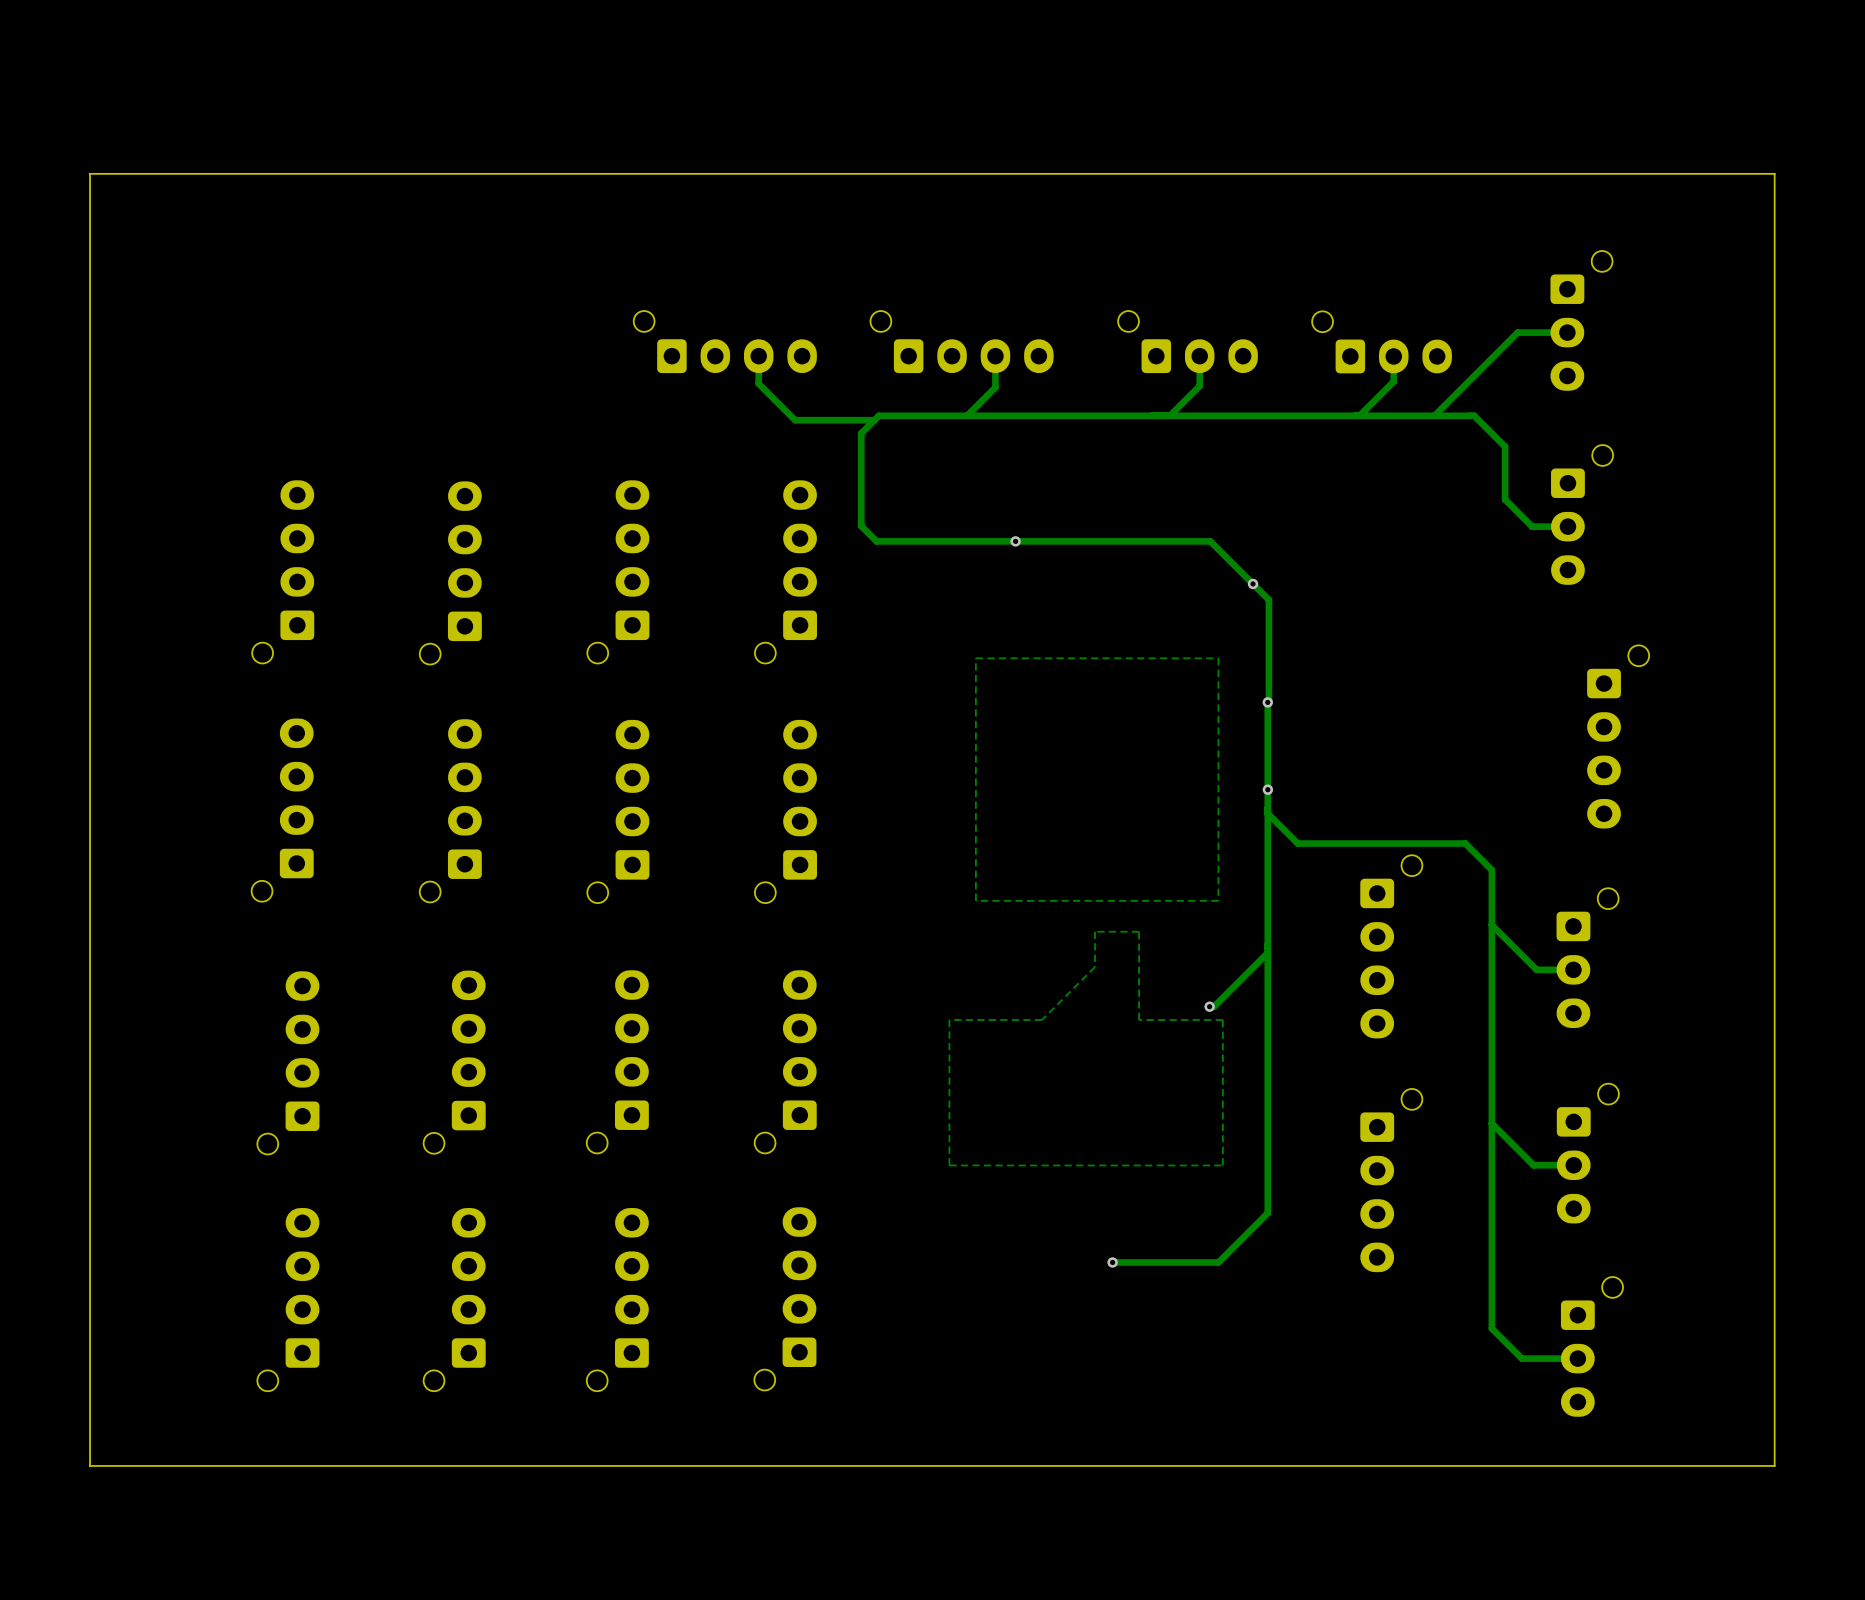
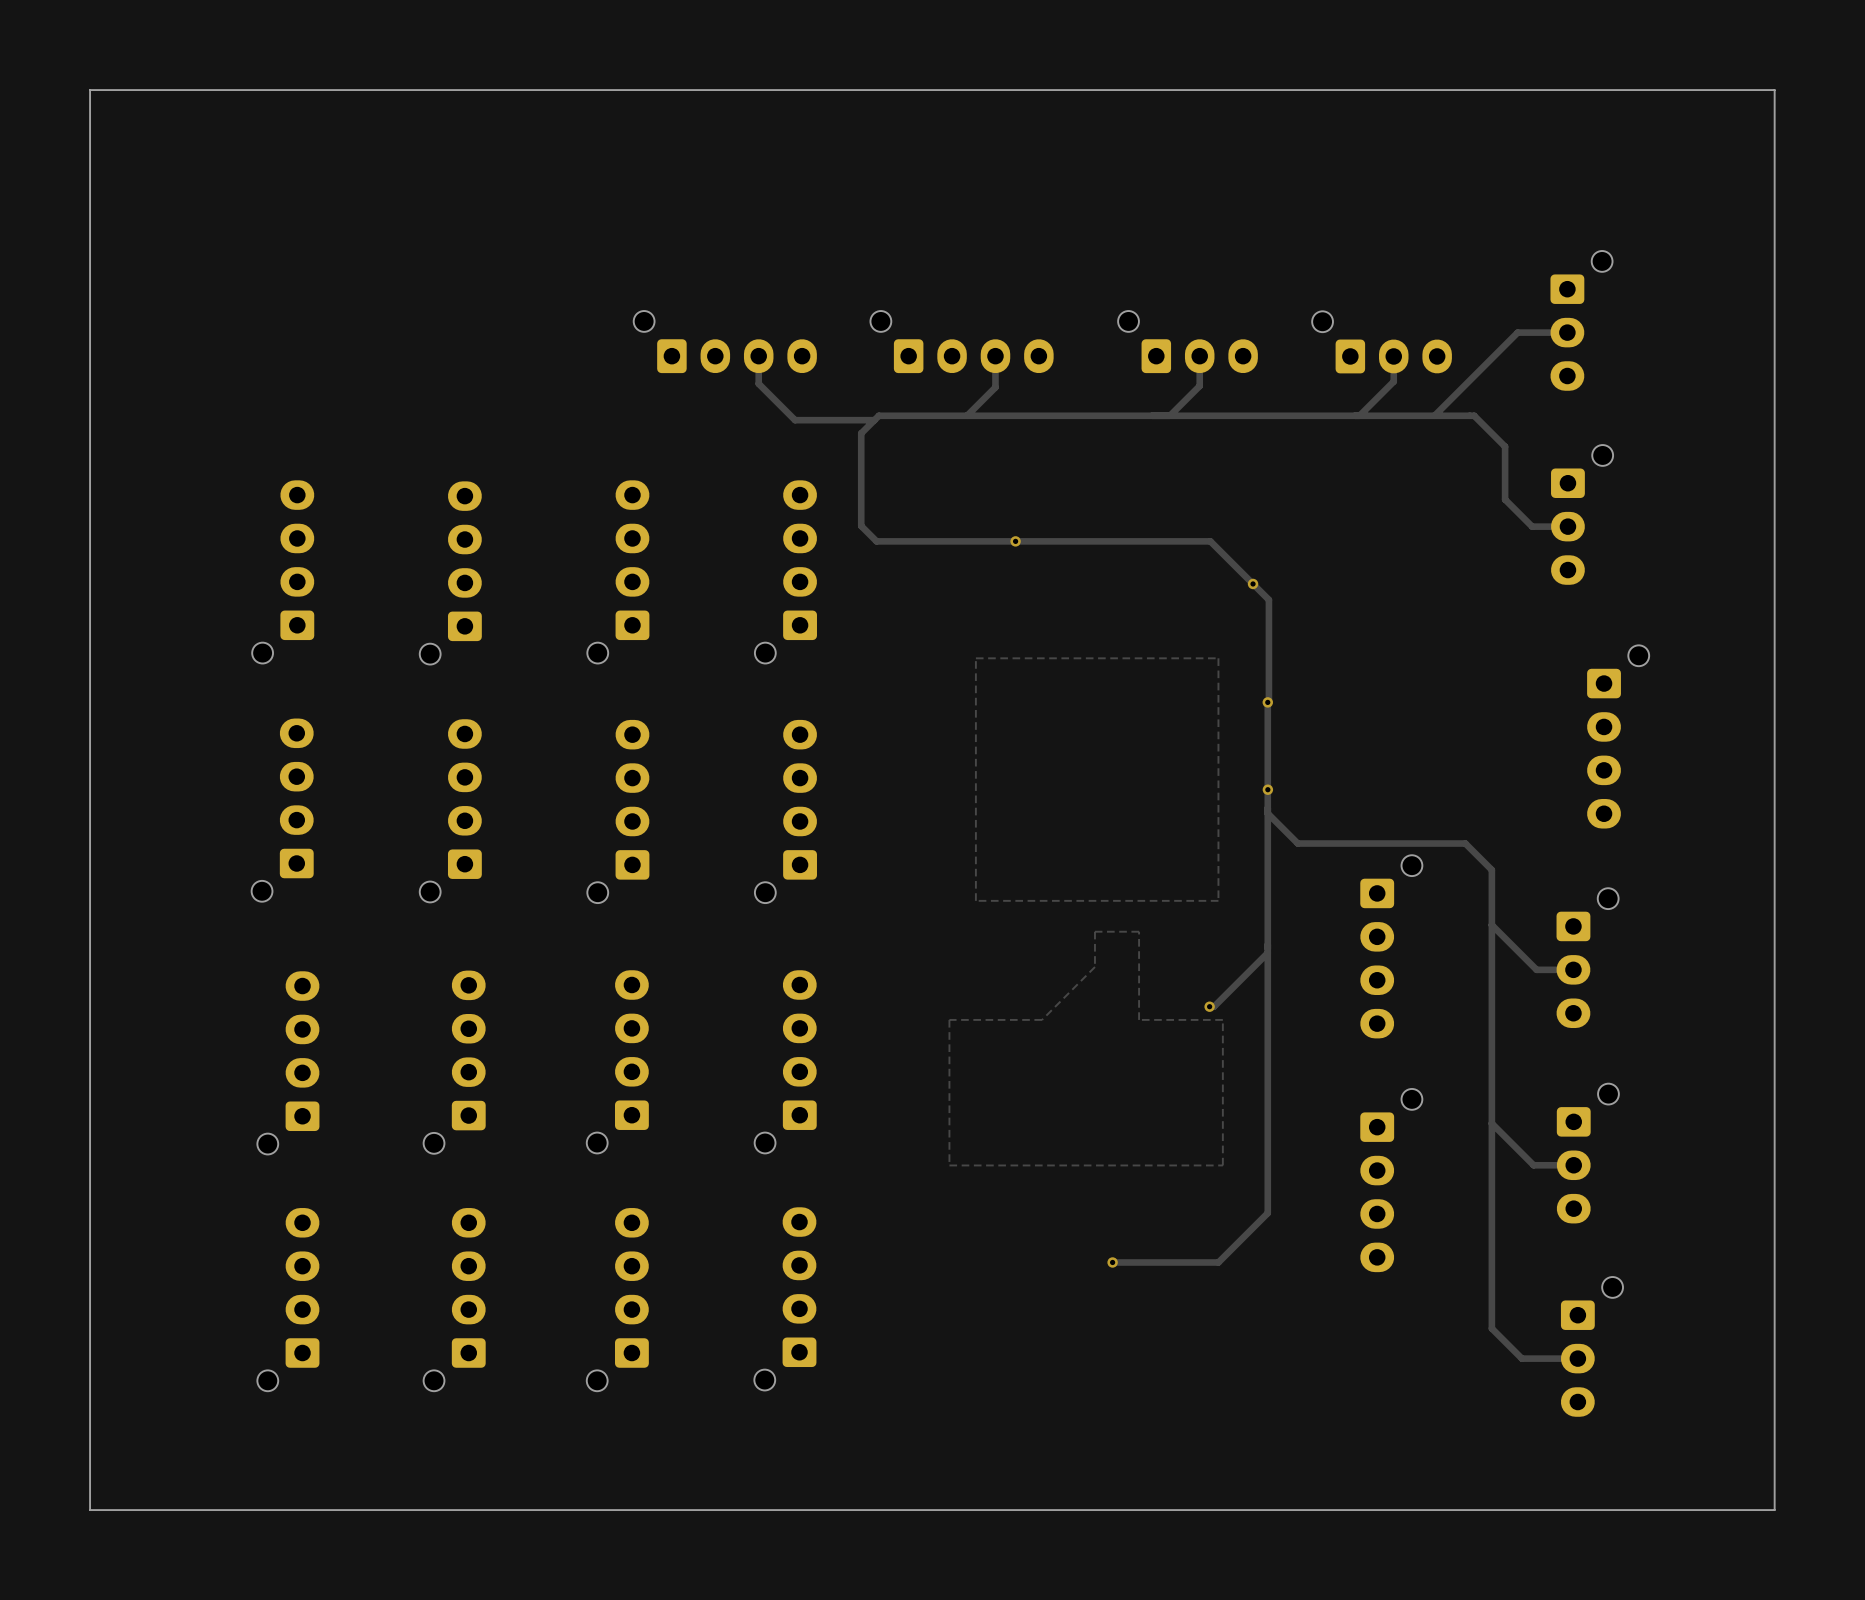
board edge: (1774, 173) (90, 173) -> (1774, 173) (1774, 90) (90, 90) (90, 173)
board edge: (1774, 1465) (90, 1465) -> (1774, 1465) (1774, 1510) (90, 1510) (90, 1465)

